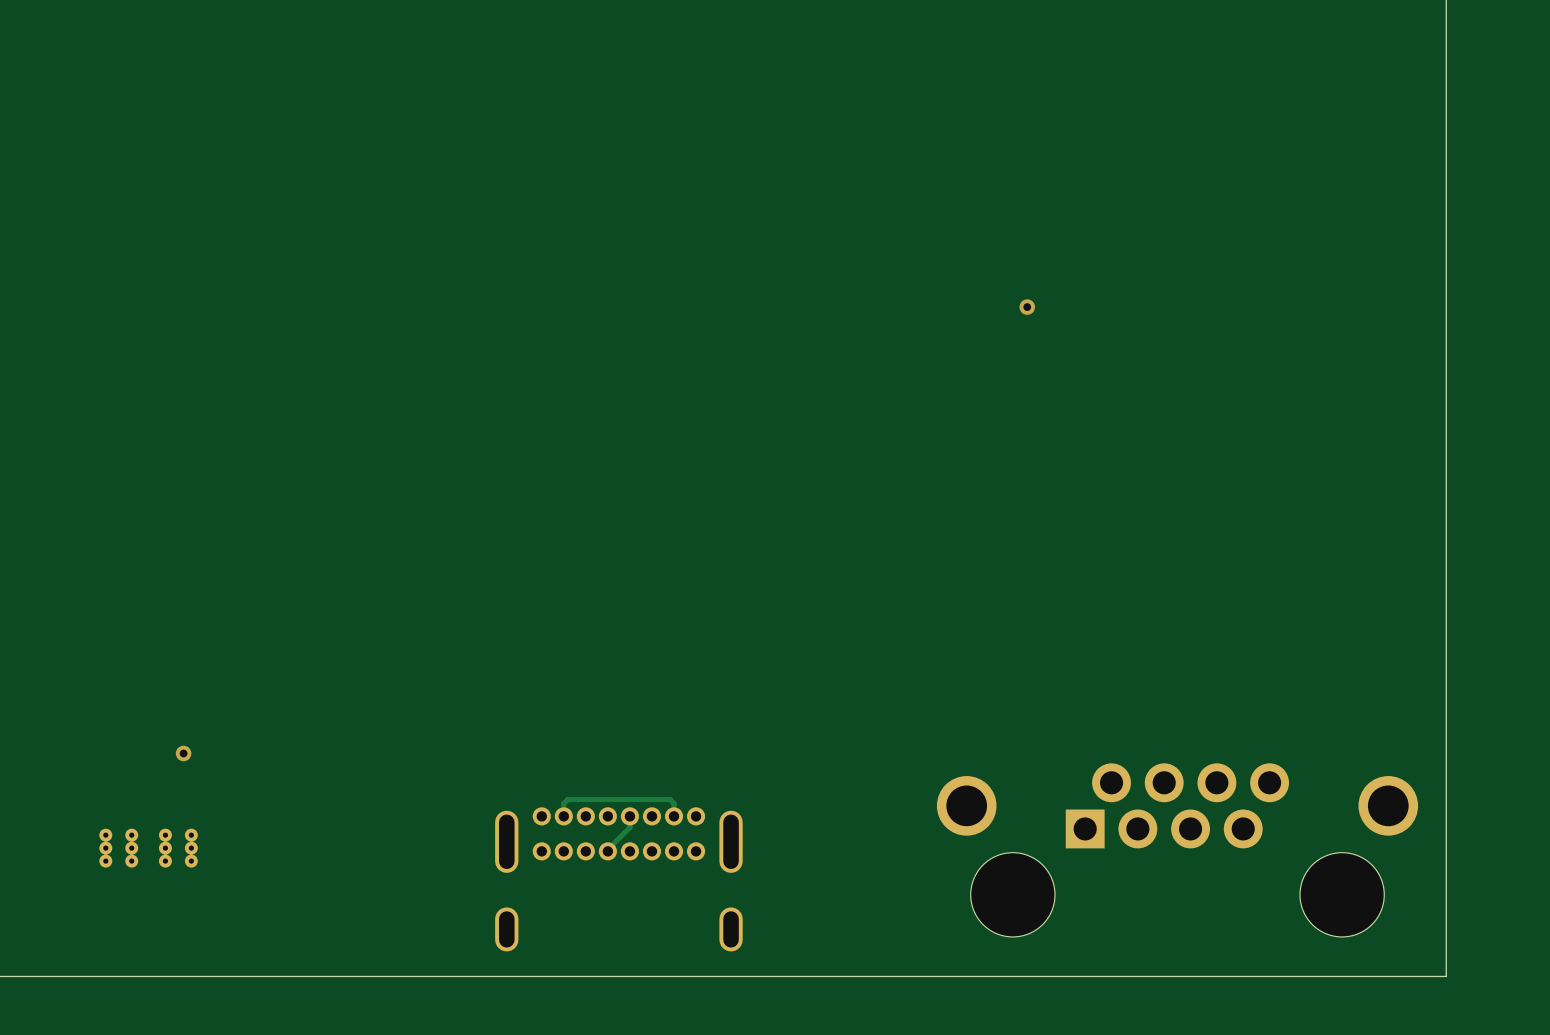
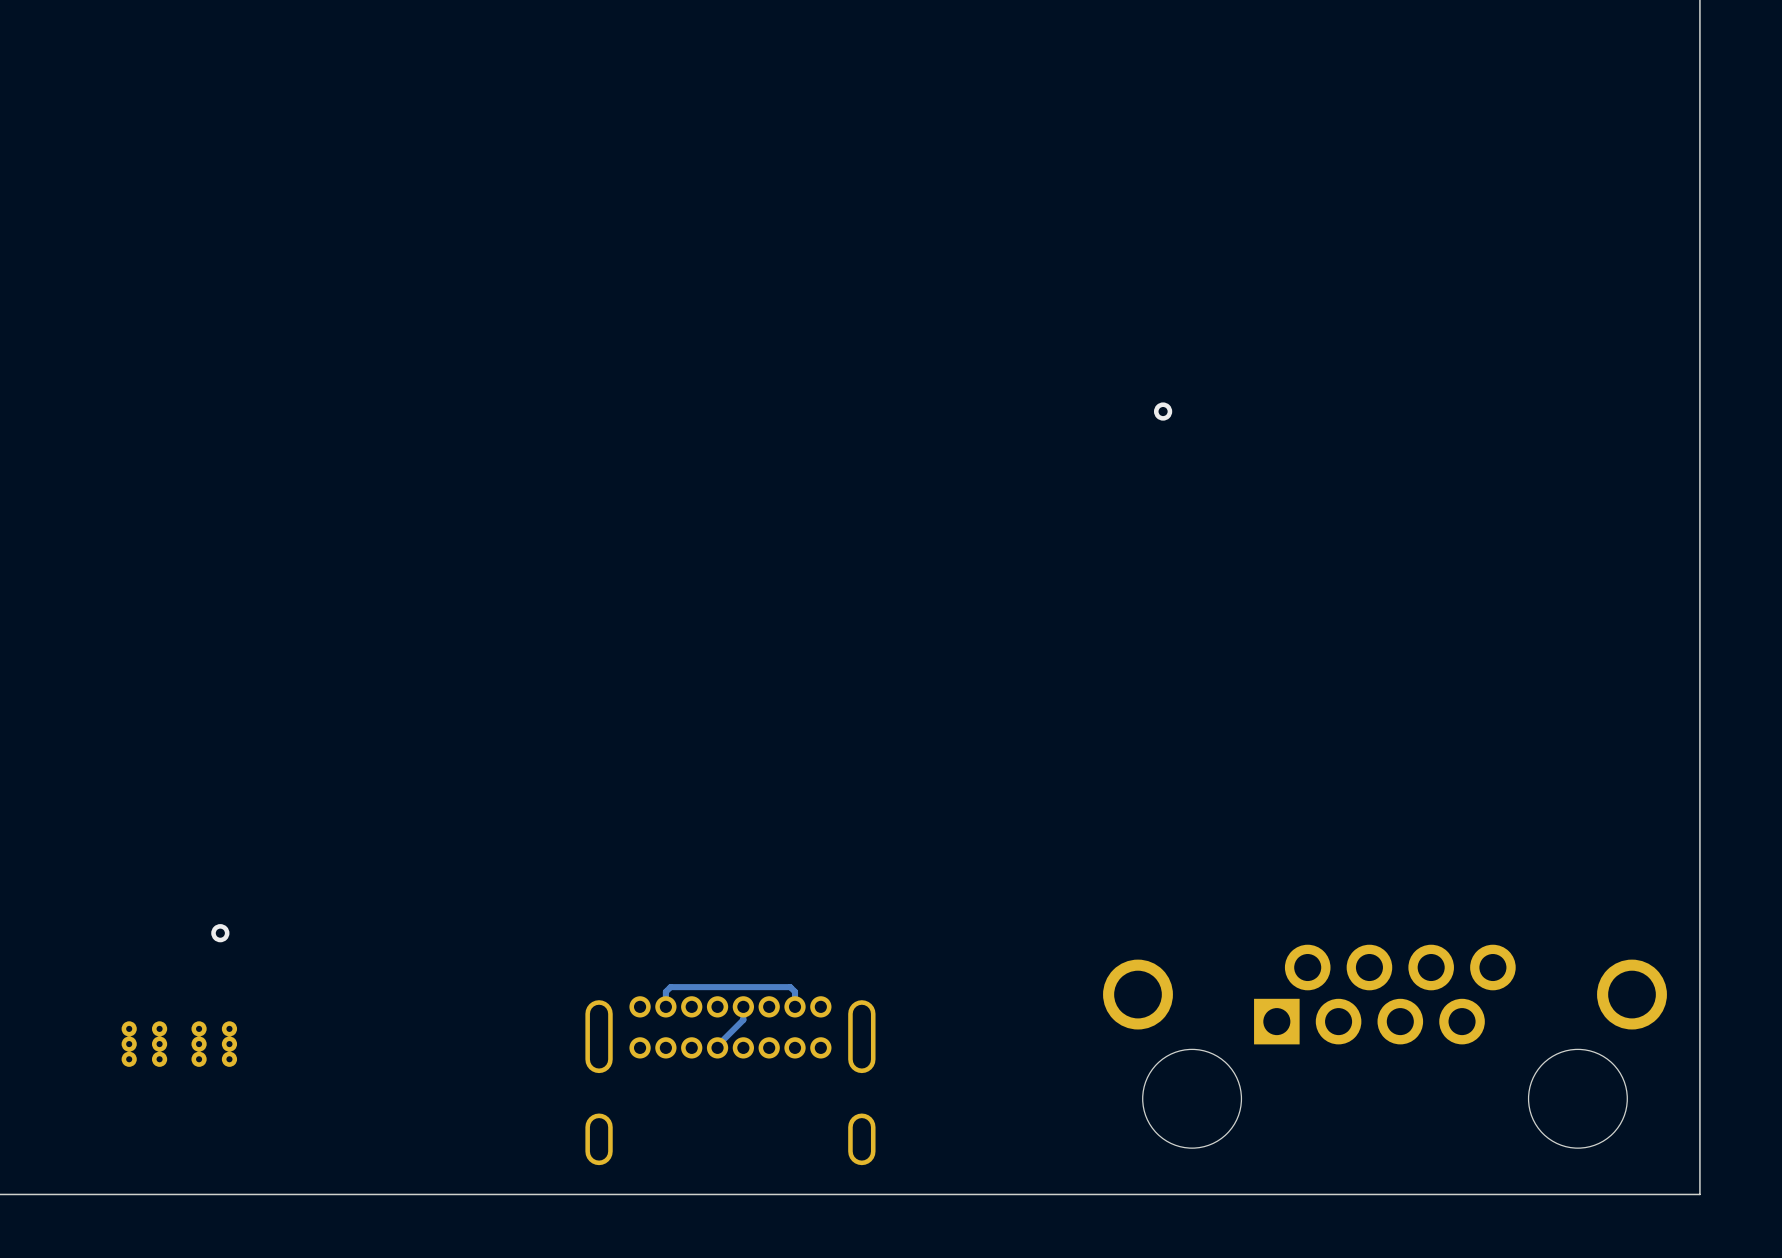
via position: (1027, 307) -> (1163, 411)

